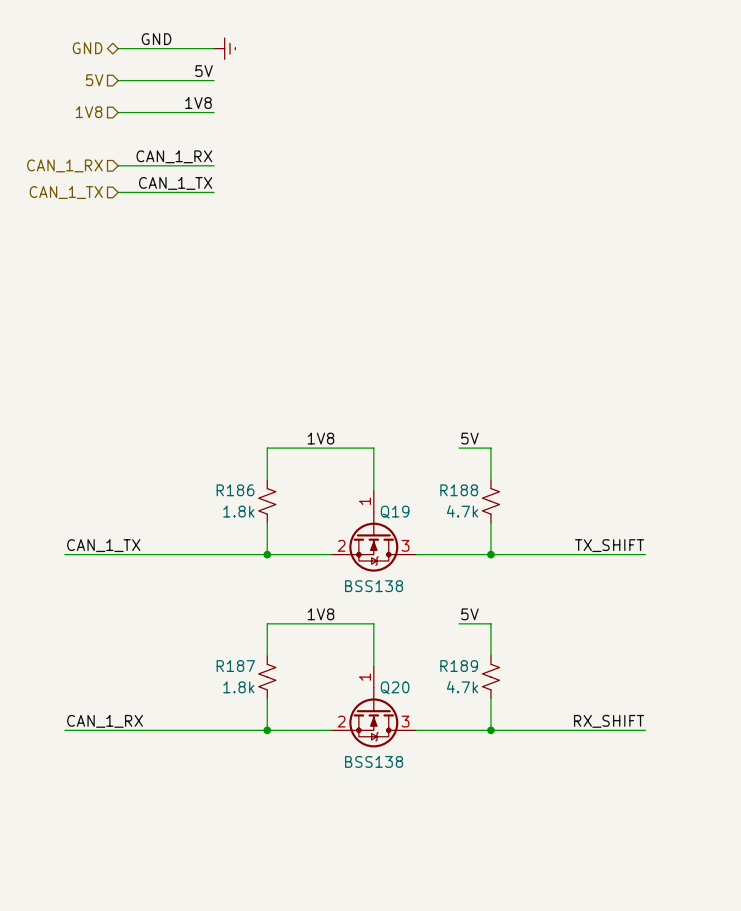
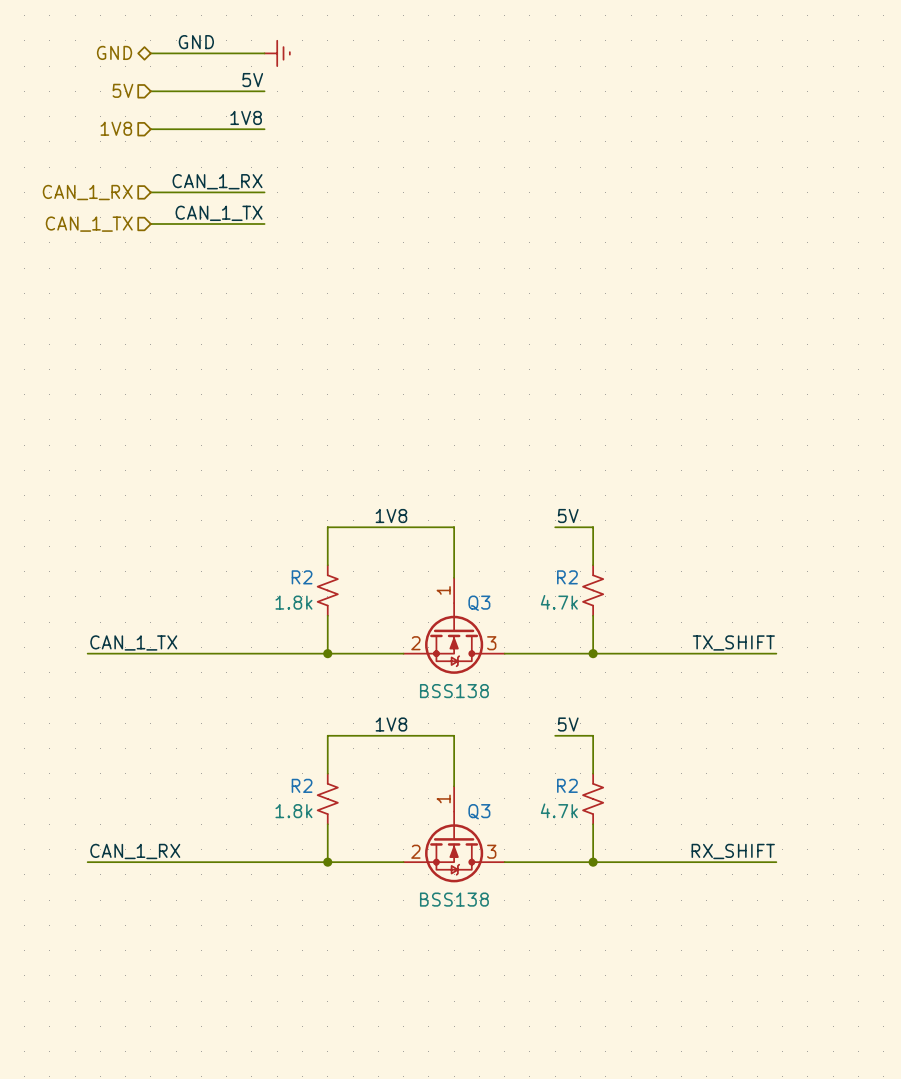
R186 name: R186 (235, 490) -> R2 (302, 577)
R188 name: R188 (459, 490) -> R2 (567, 577)
Q19 name: Q19 (395, 512) -> Q3 (479, 603)
R187 name: R187 (235, 666) -> R2 (302, 785)
R189 name: R189 (459, 666) -> R2 (567, 785)
Q20 name: Q20 (395, 687) -> Q3 (479, 811)

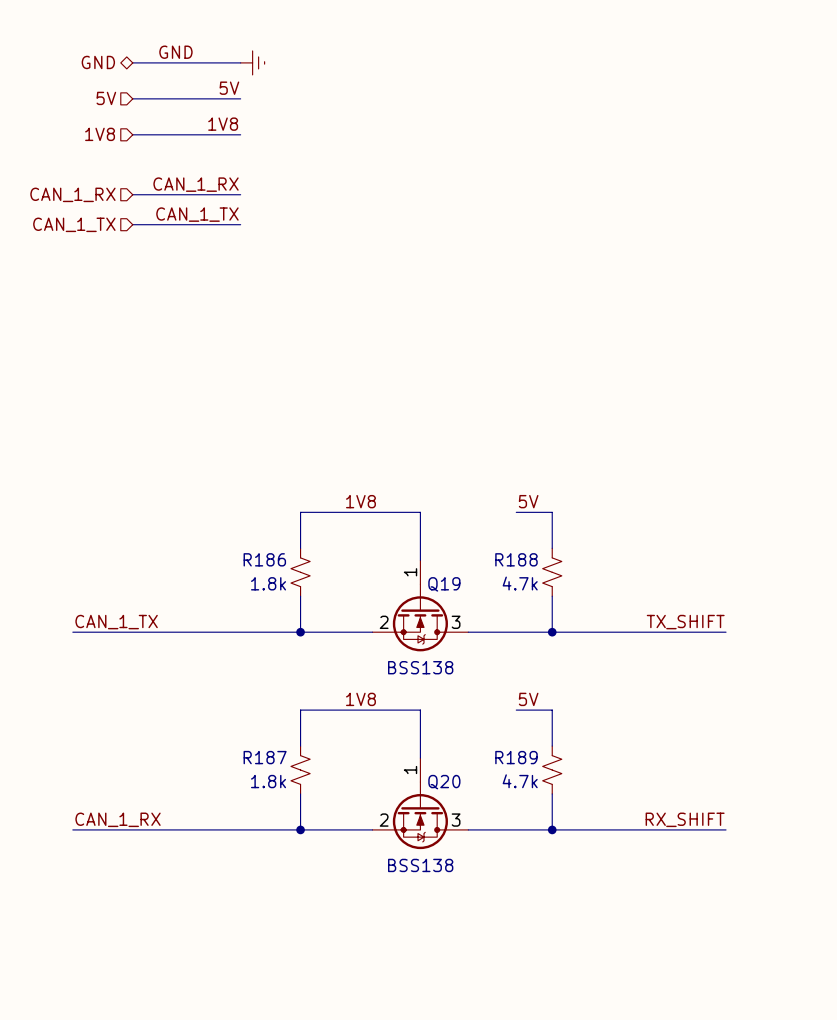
R2 name: R2 (302, 577) -> R186 (264, 559)
R2 name: R2 (567, 577) -> R188 (516, 559)
Q3 name: Q3 (479, 603) -> Q19 (444, 584)
R2 name: R2 (302, 785) -> R187 (265, 757)
R2 name: R2 (567, 785) -> R189 (516, 757)
Q3 name: Q3 (479, 811) -> Q20 (444, 782)

